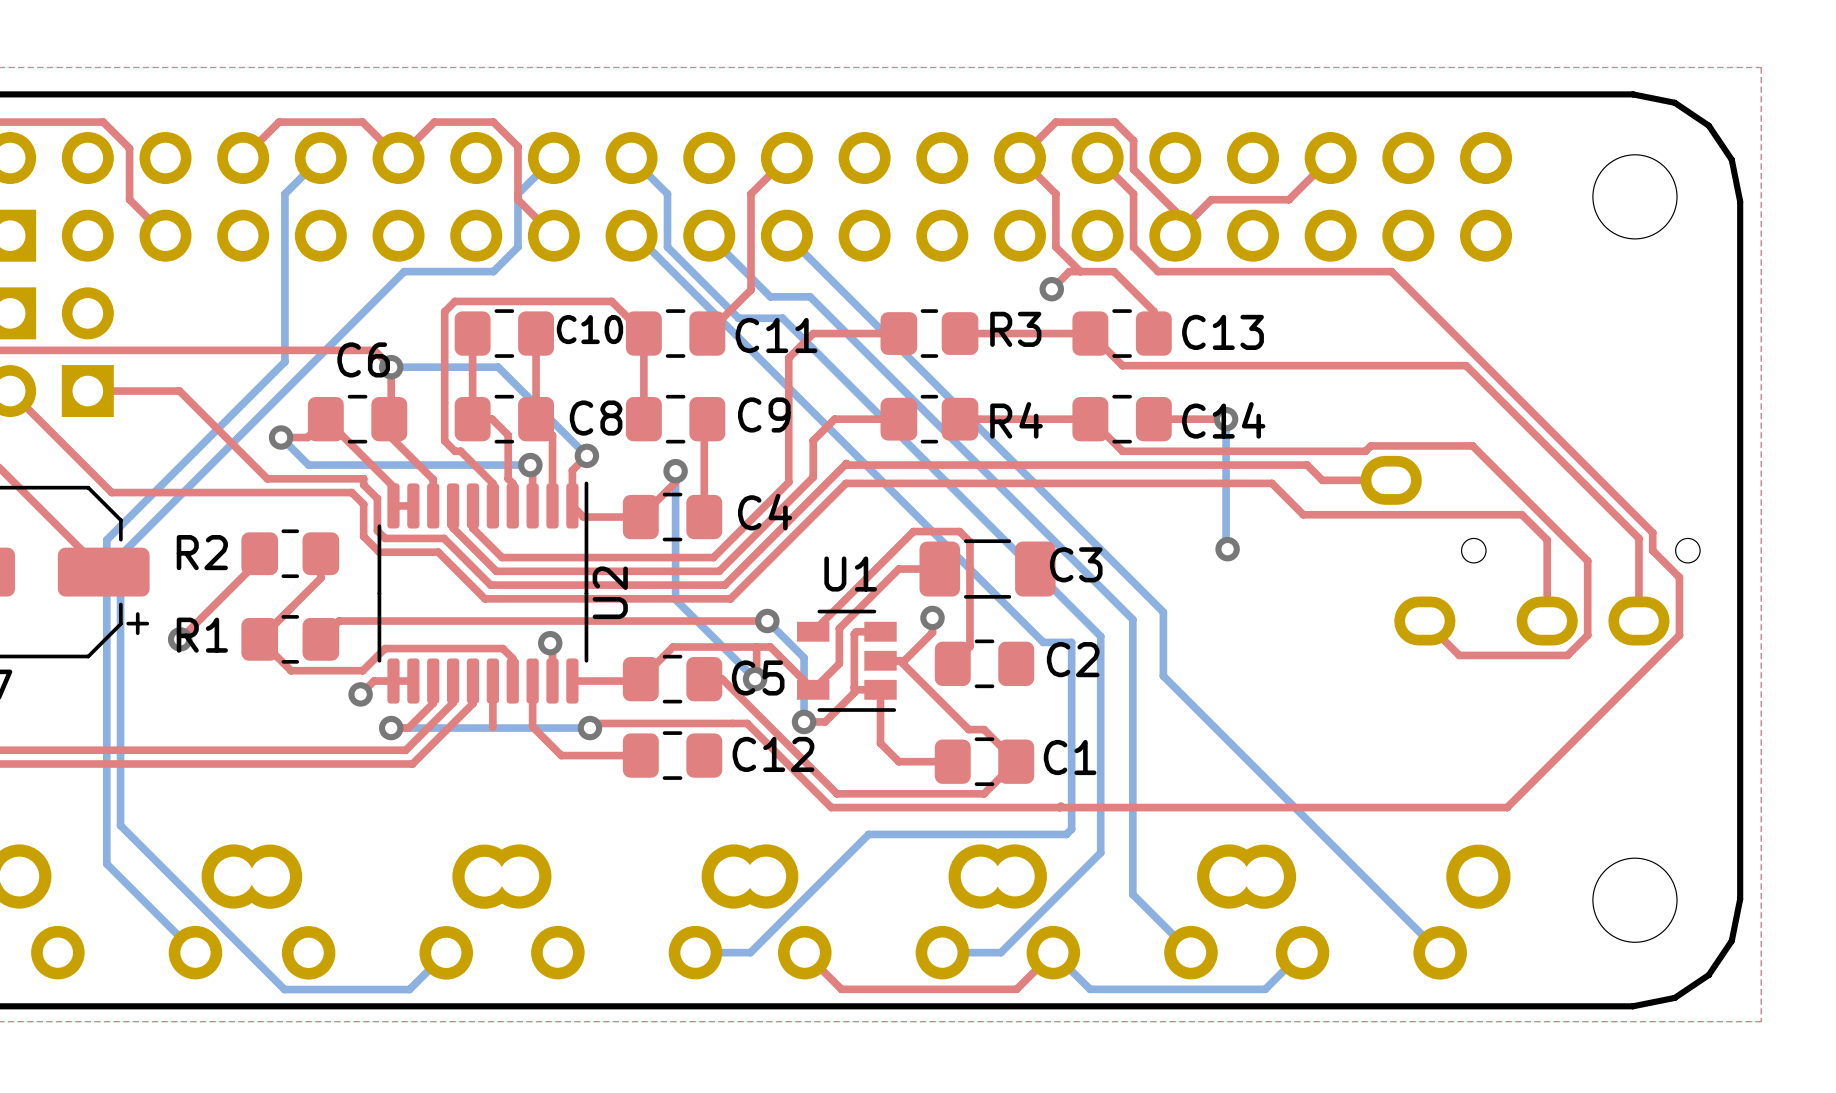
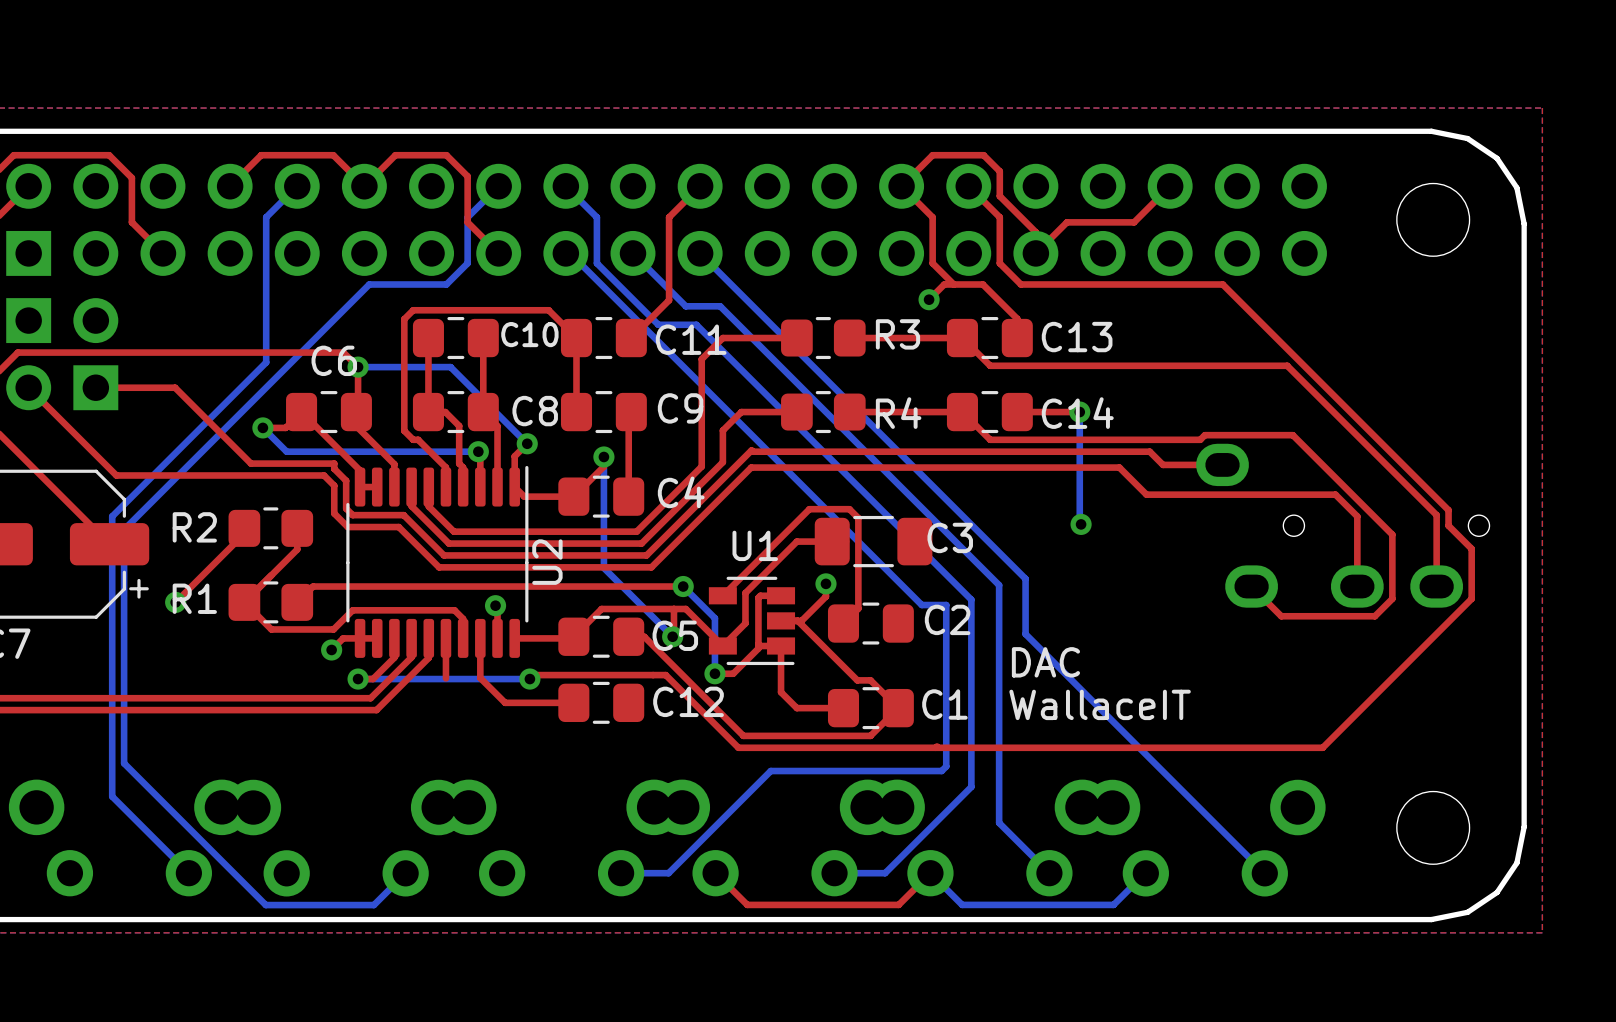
text: none -> DAC (1045, 662)
text: none -> WallaceIT (1100, 704)

